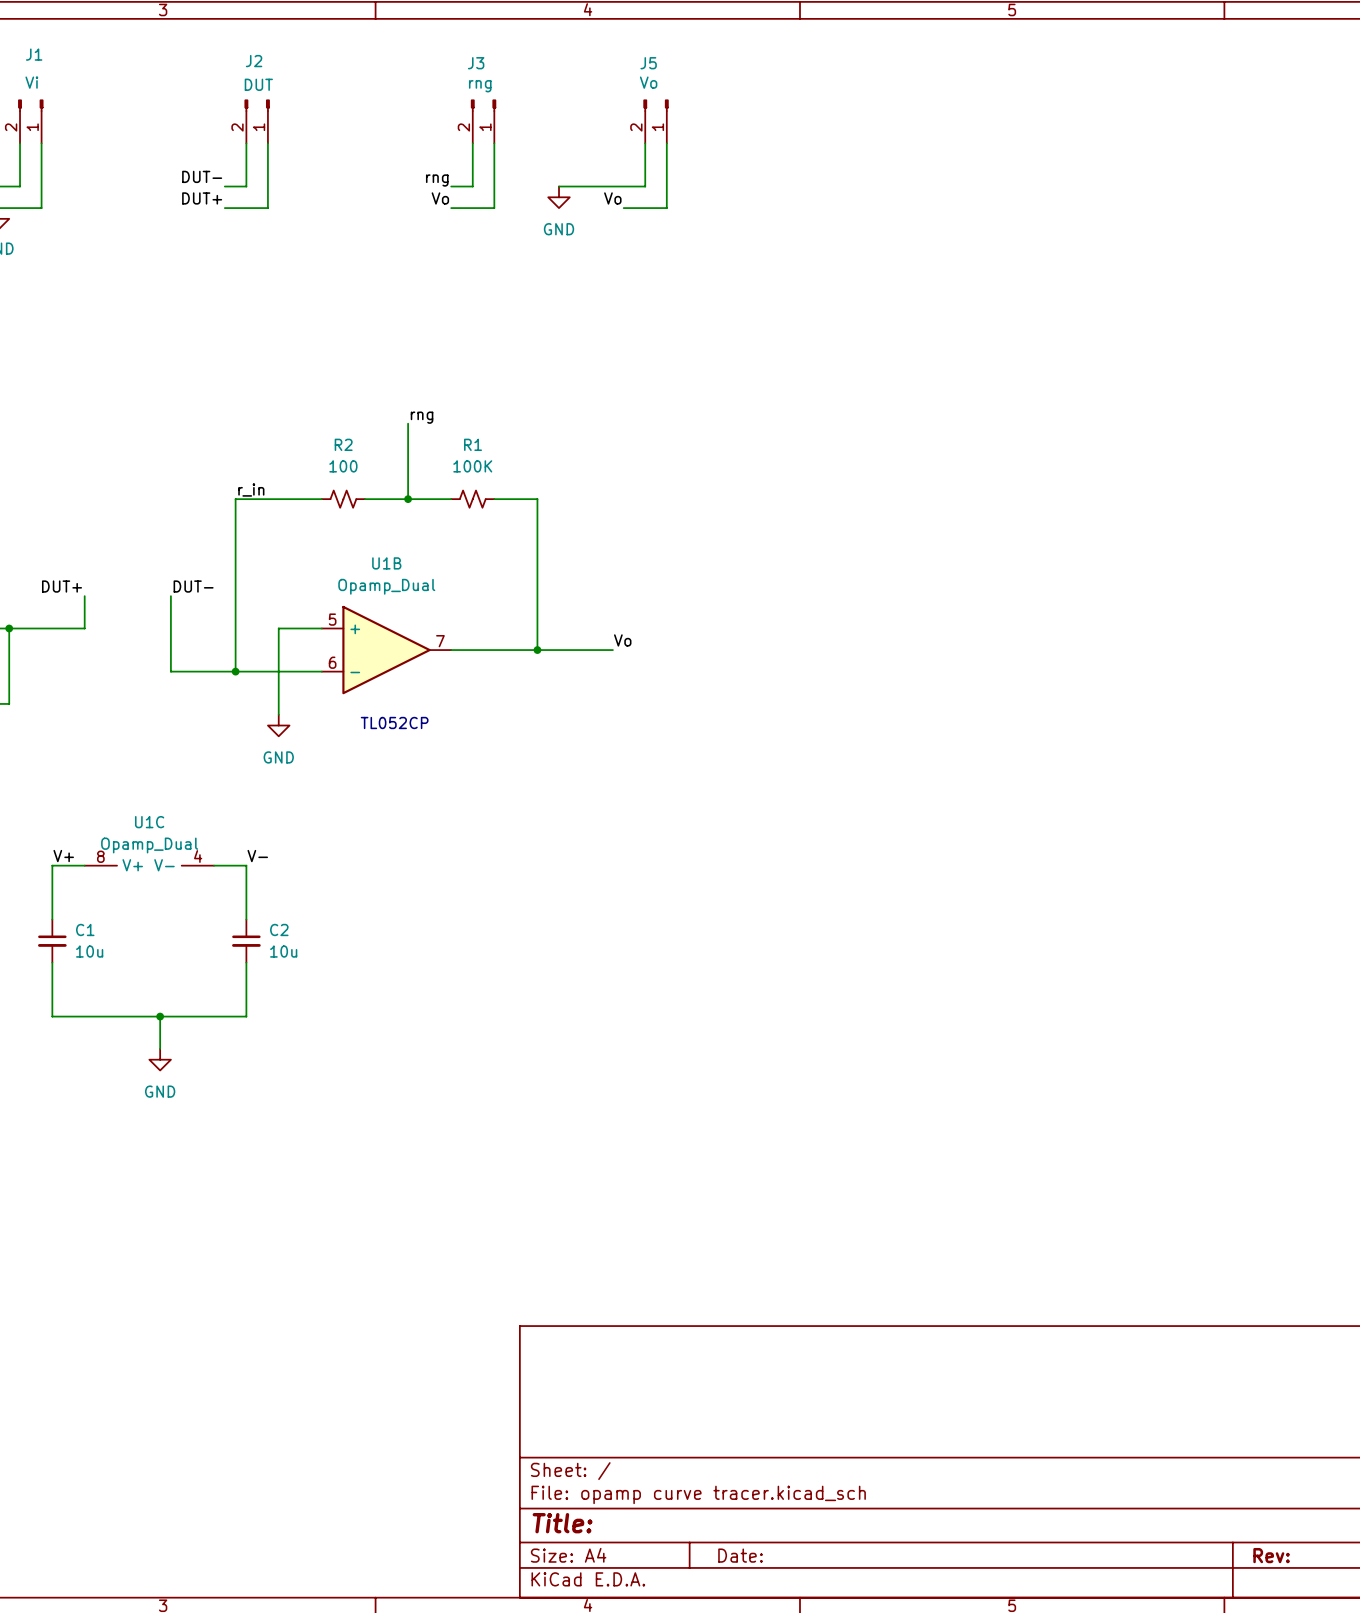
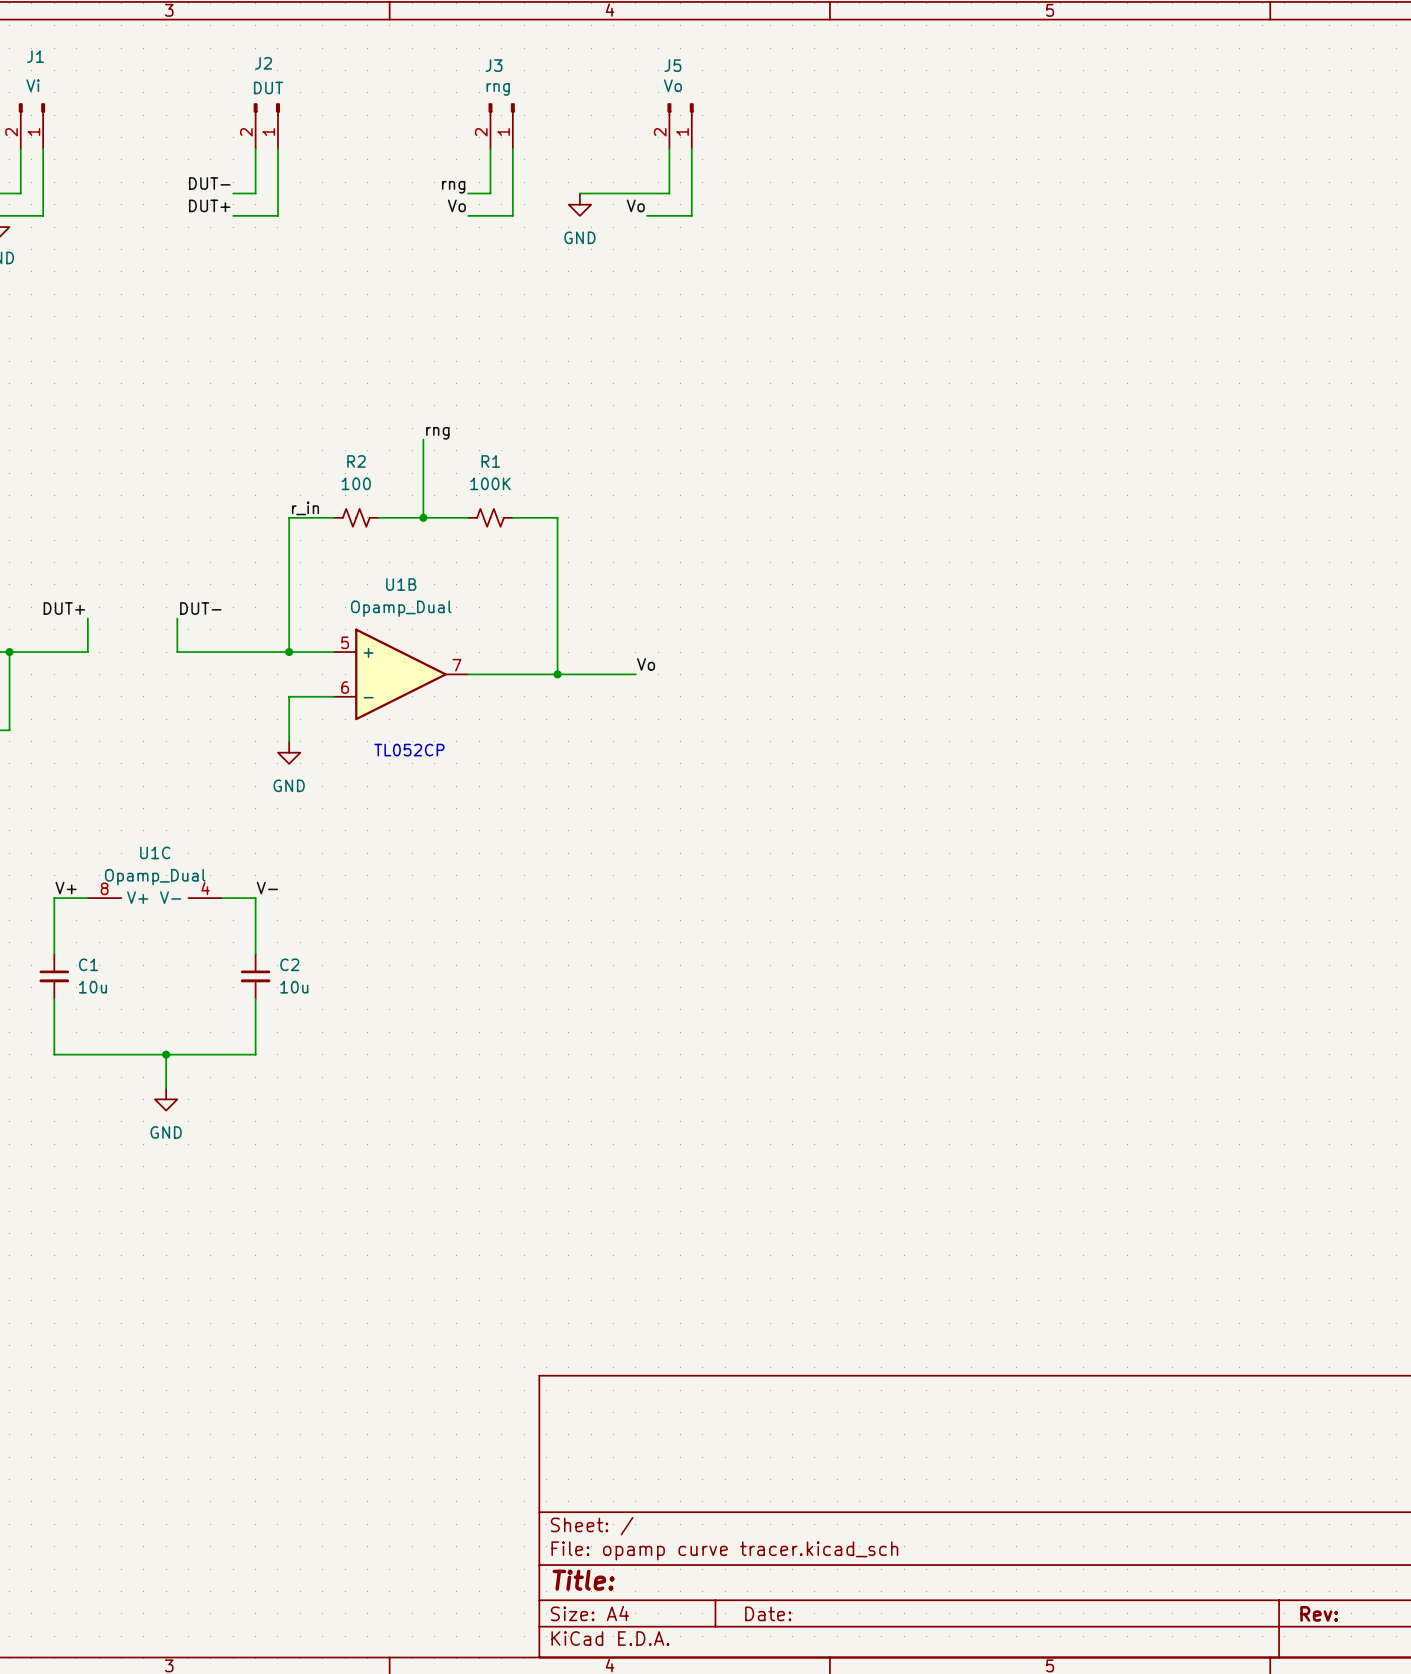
label position: r_in (251, 490) -> r_in (305, 508)
wire: (278, 499) (235, 499) (235, 671) -> (289, 517) (289, 652) (177, 652)
wire: (170, 628) (170, 671) (278, 671) (278, 628) -> none
junction: none -> (289, 652)
junction: (235, 671) -> none

